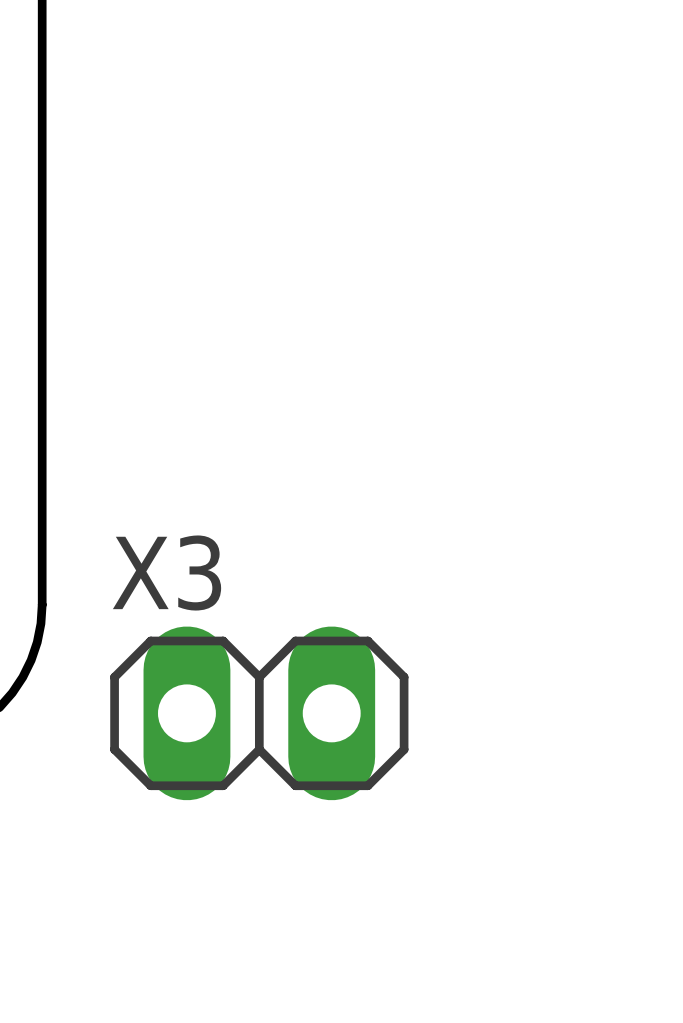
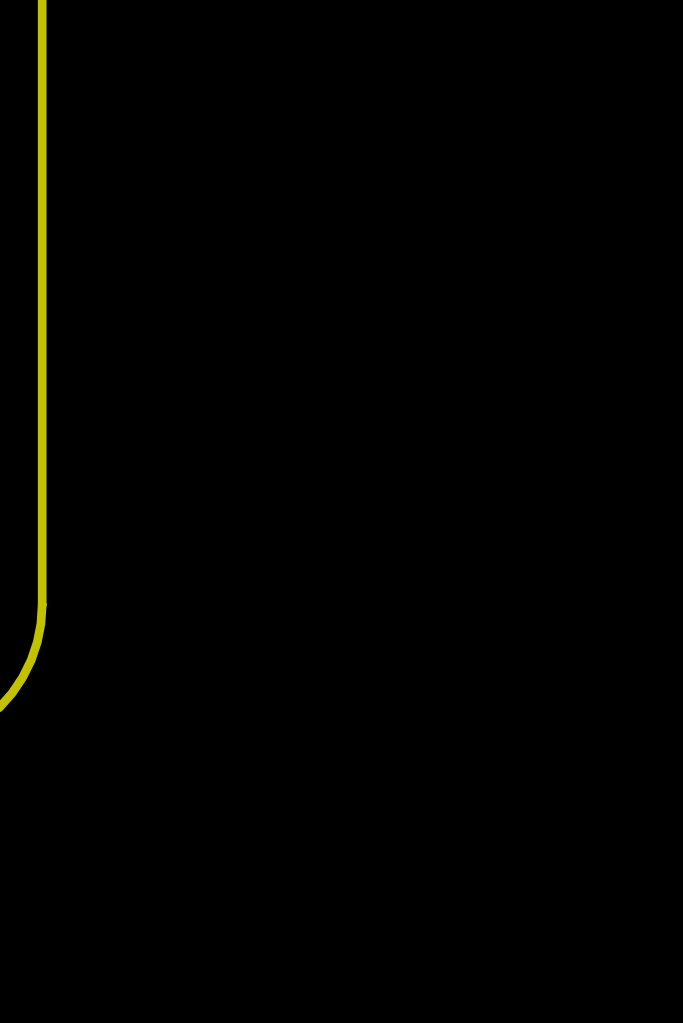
X3: (259, 713) -> none

